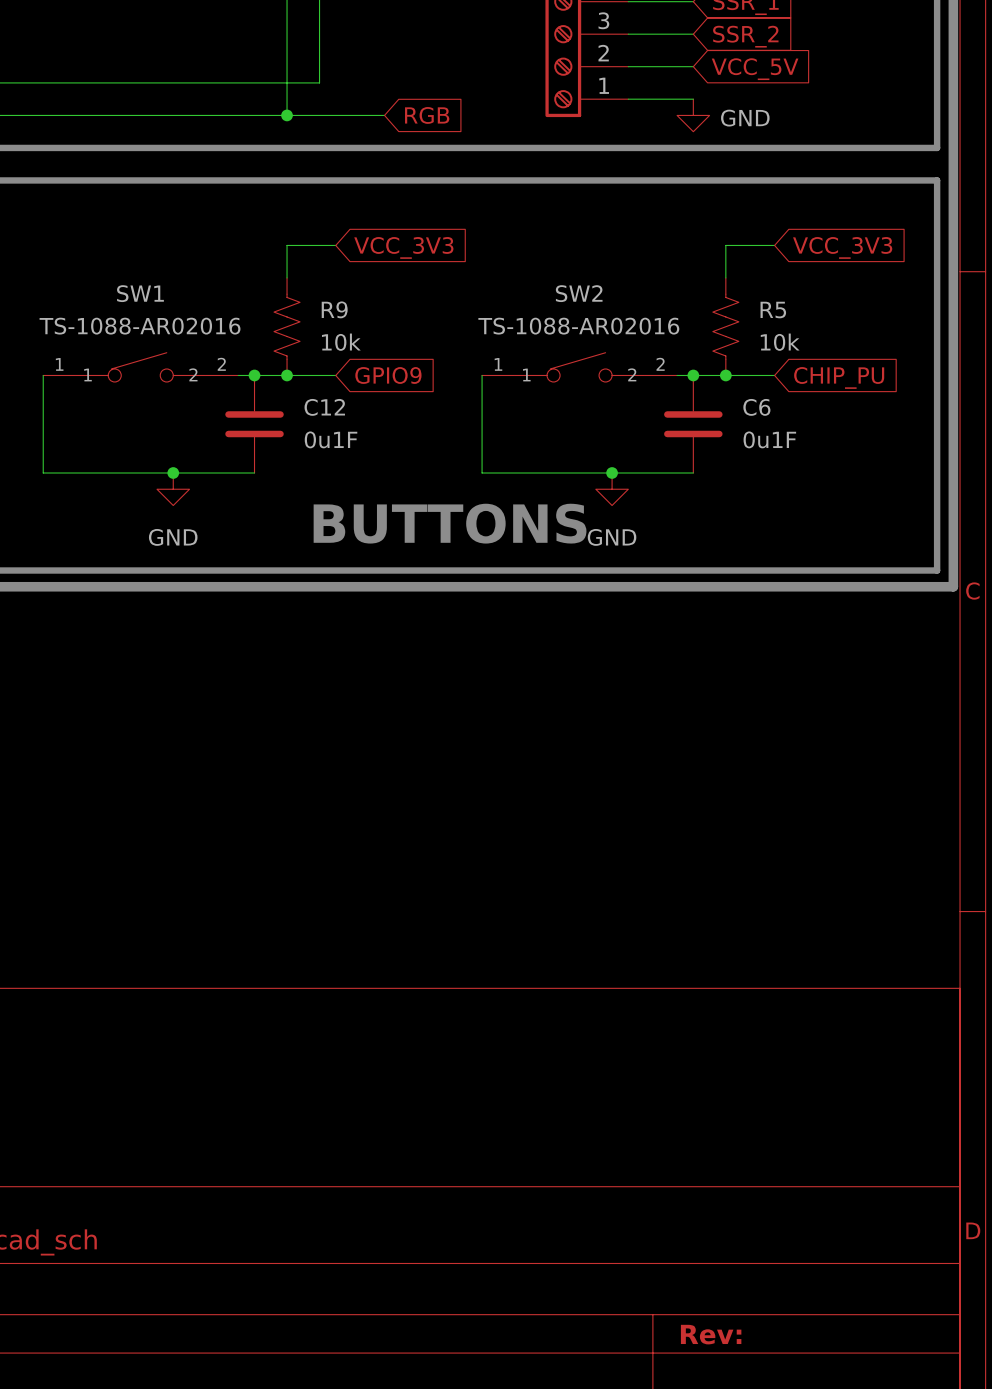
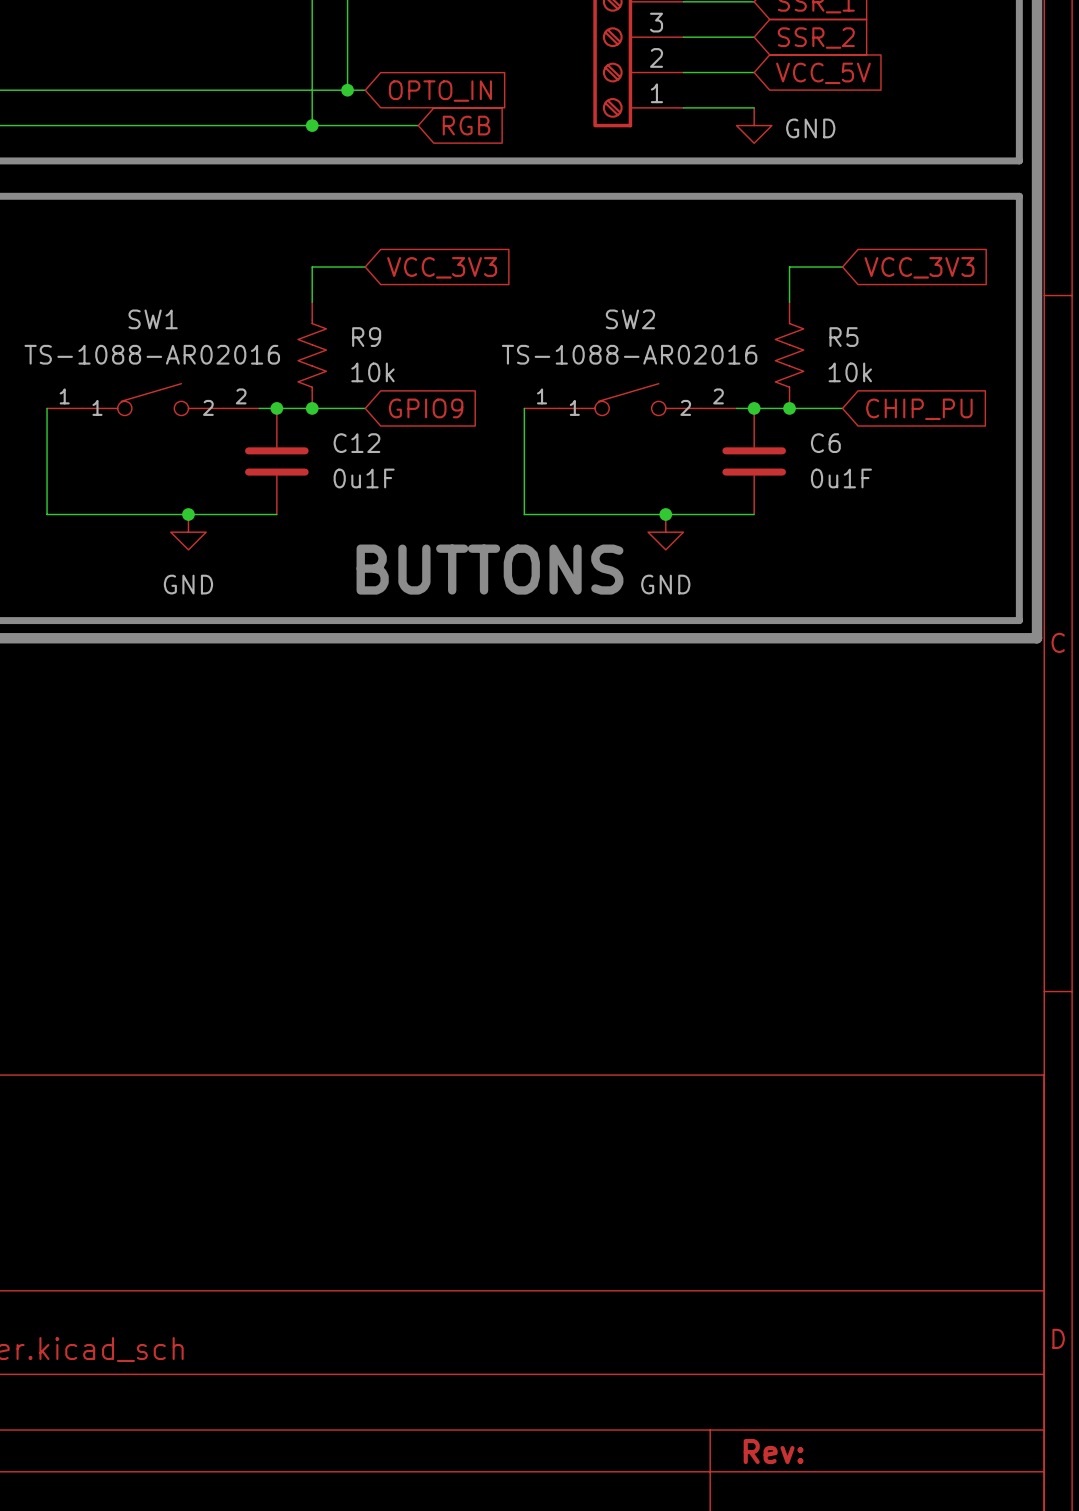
wire: none -> (347, 90) (365, 90)
junction: none -> (347, 90)
global label: none -> OPTO_IN (440, 91)

